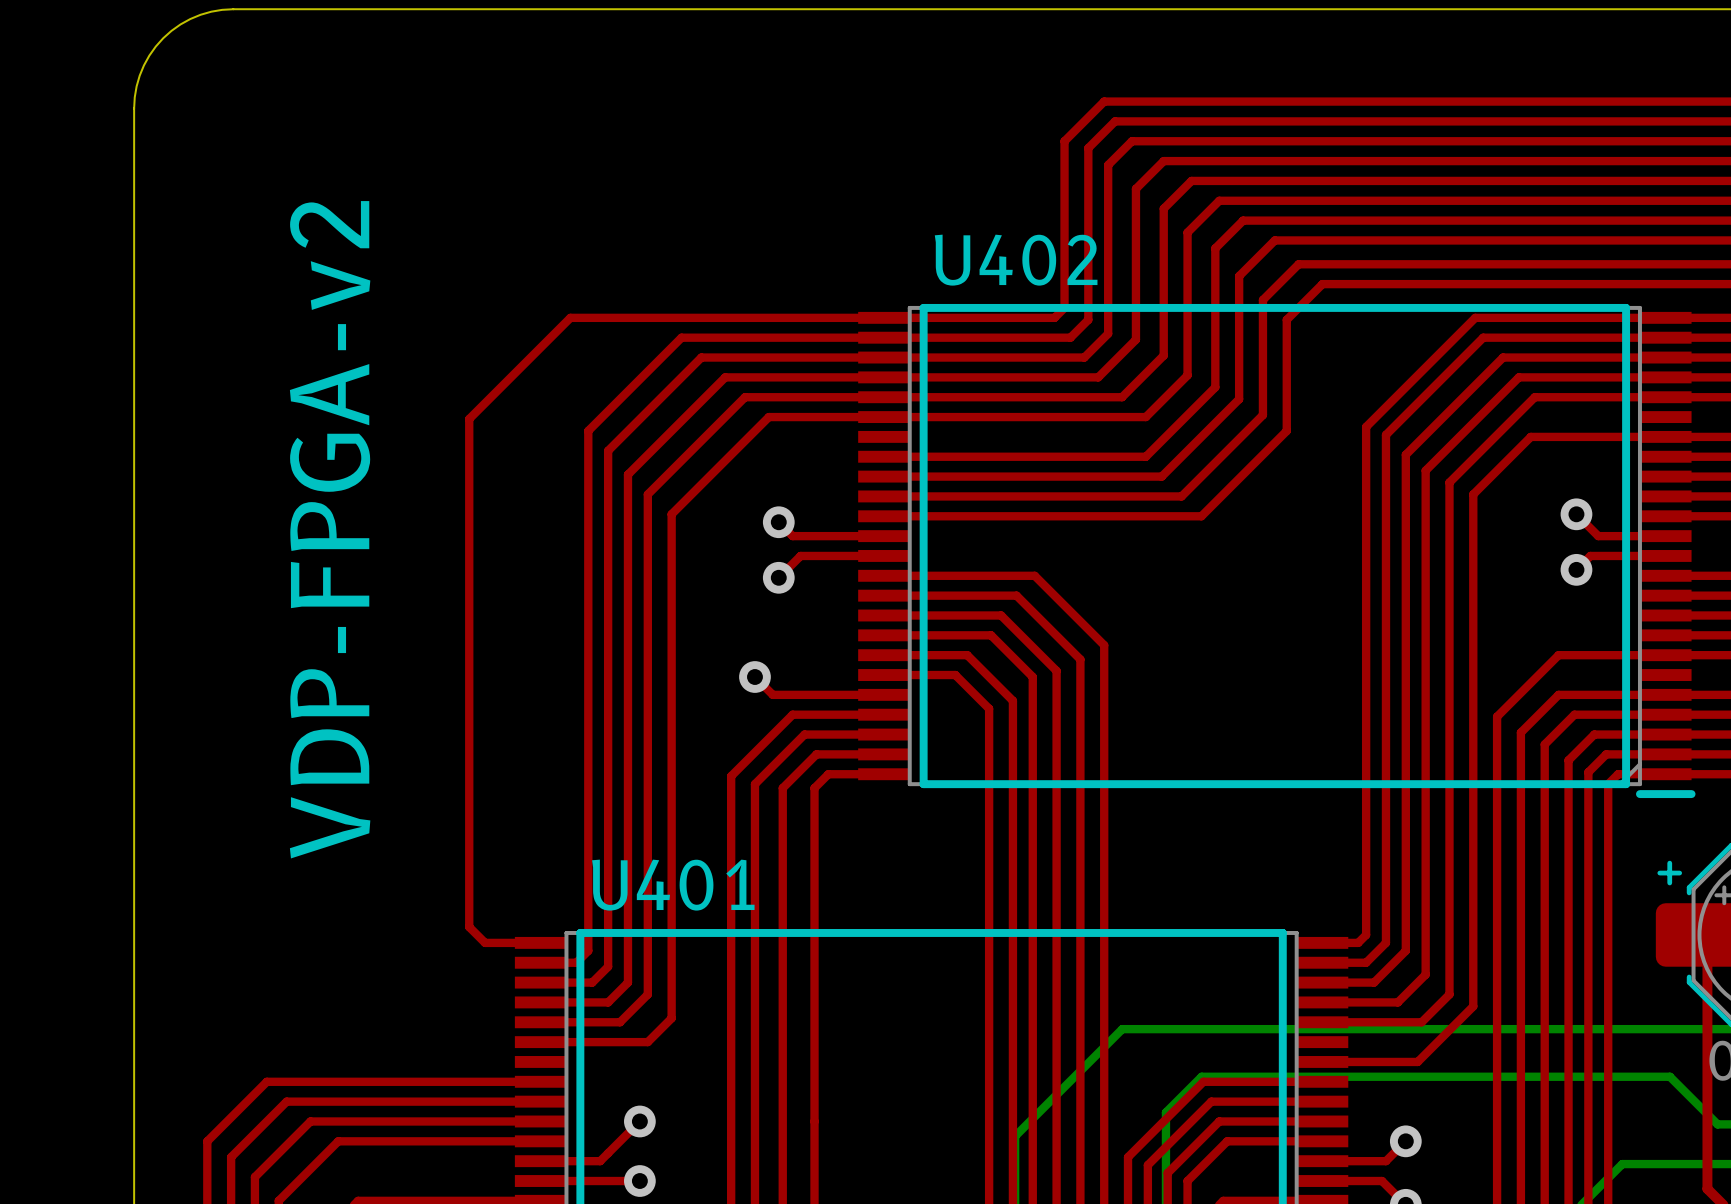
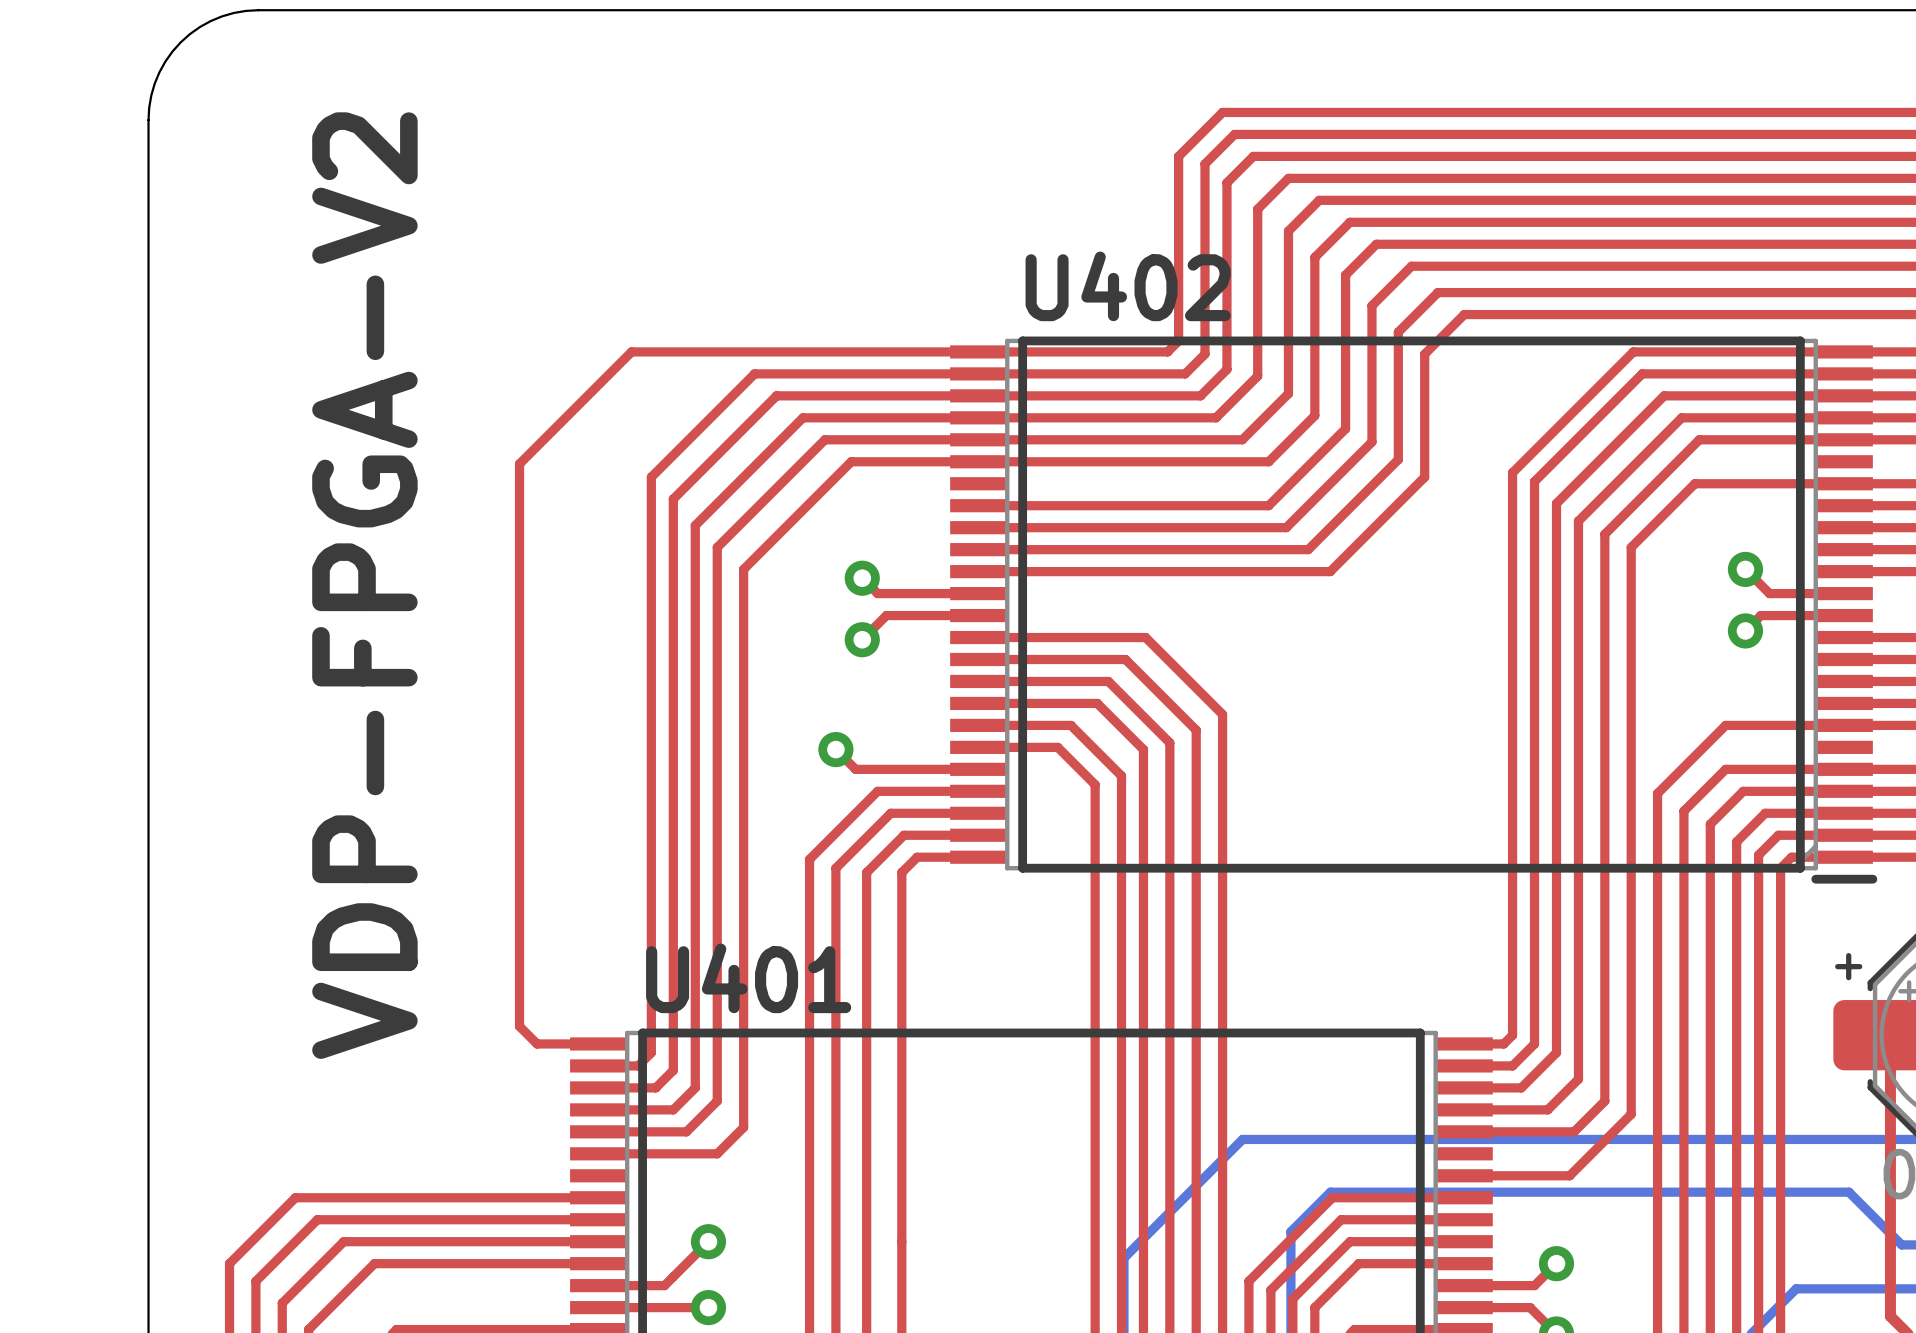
text: VDP-FPGA-v2 (330, 529) -> VDP-FPGA-V2 (364, 585)

